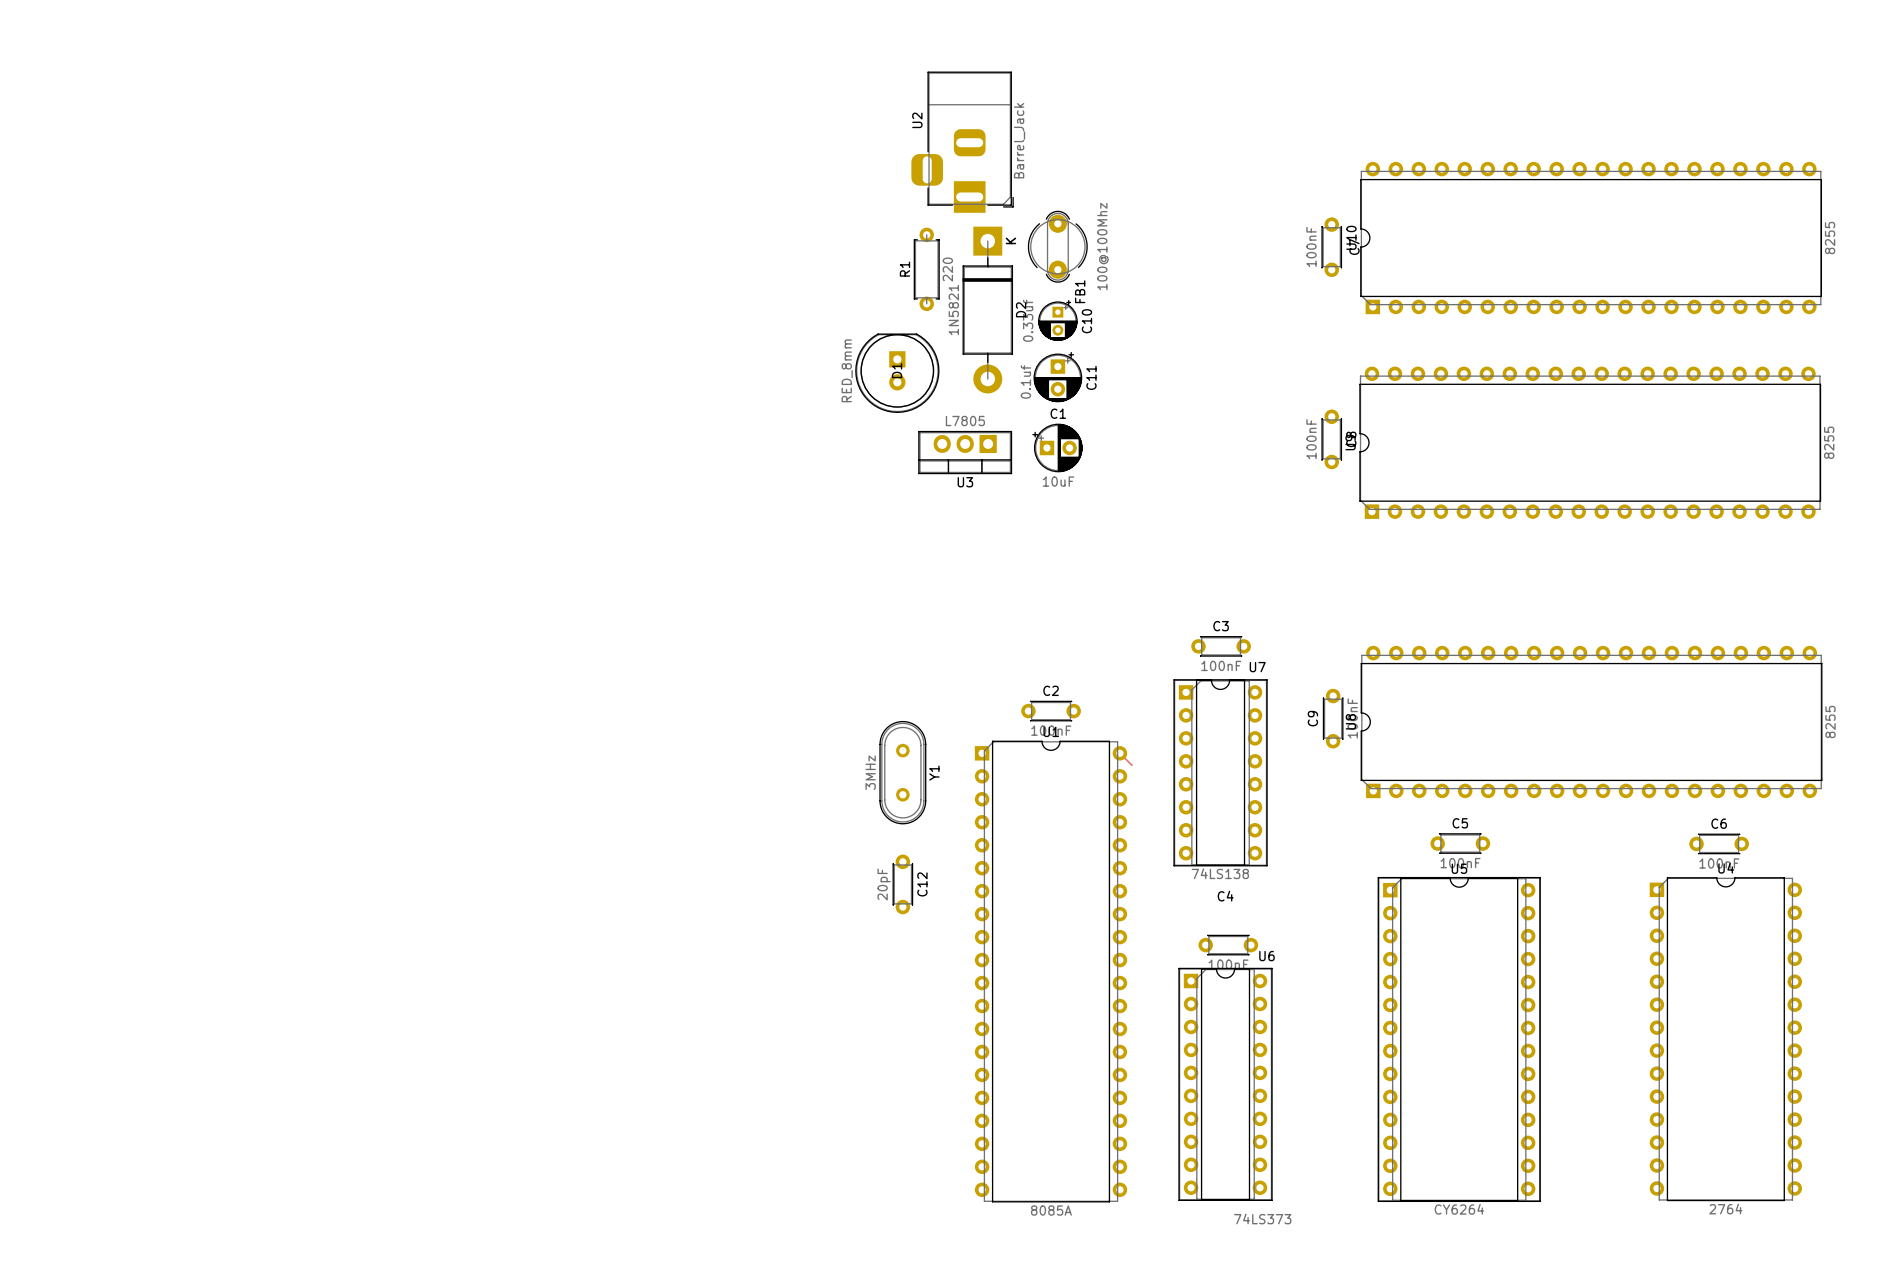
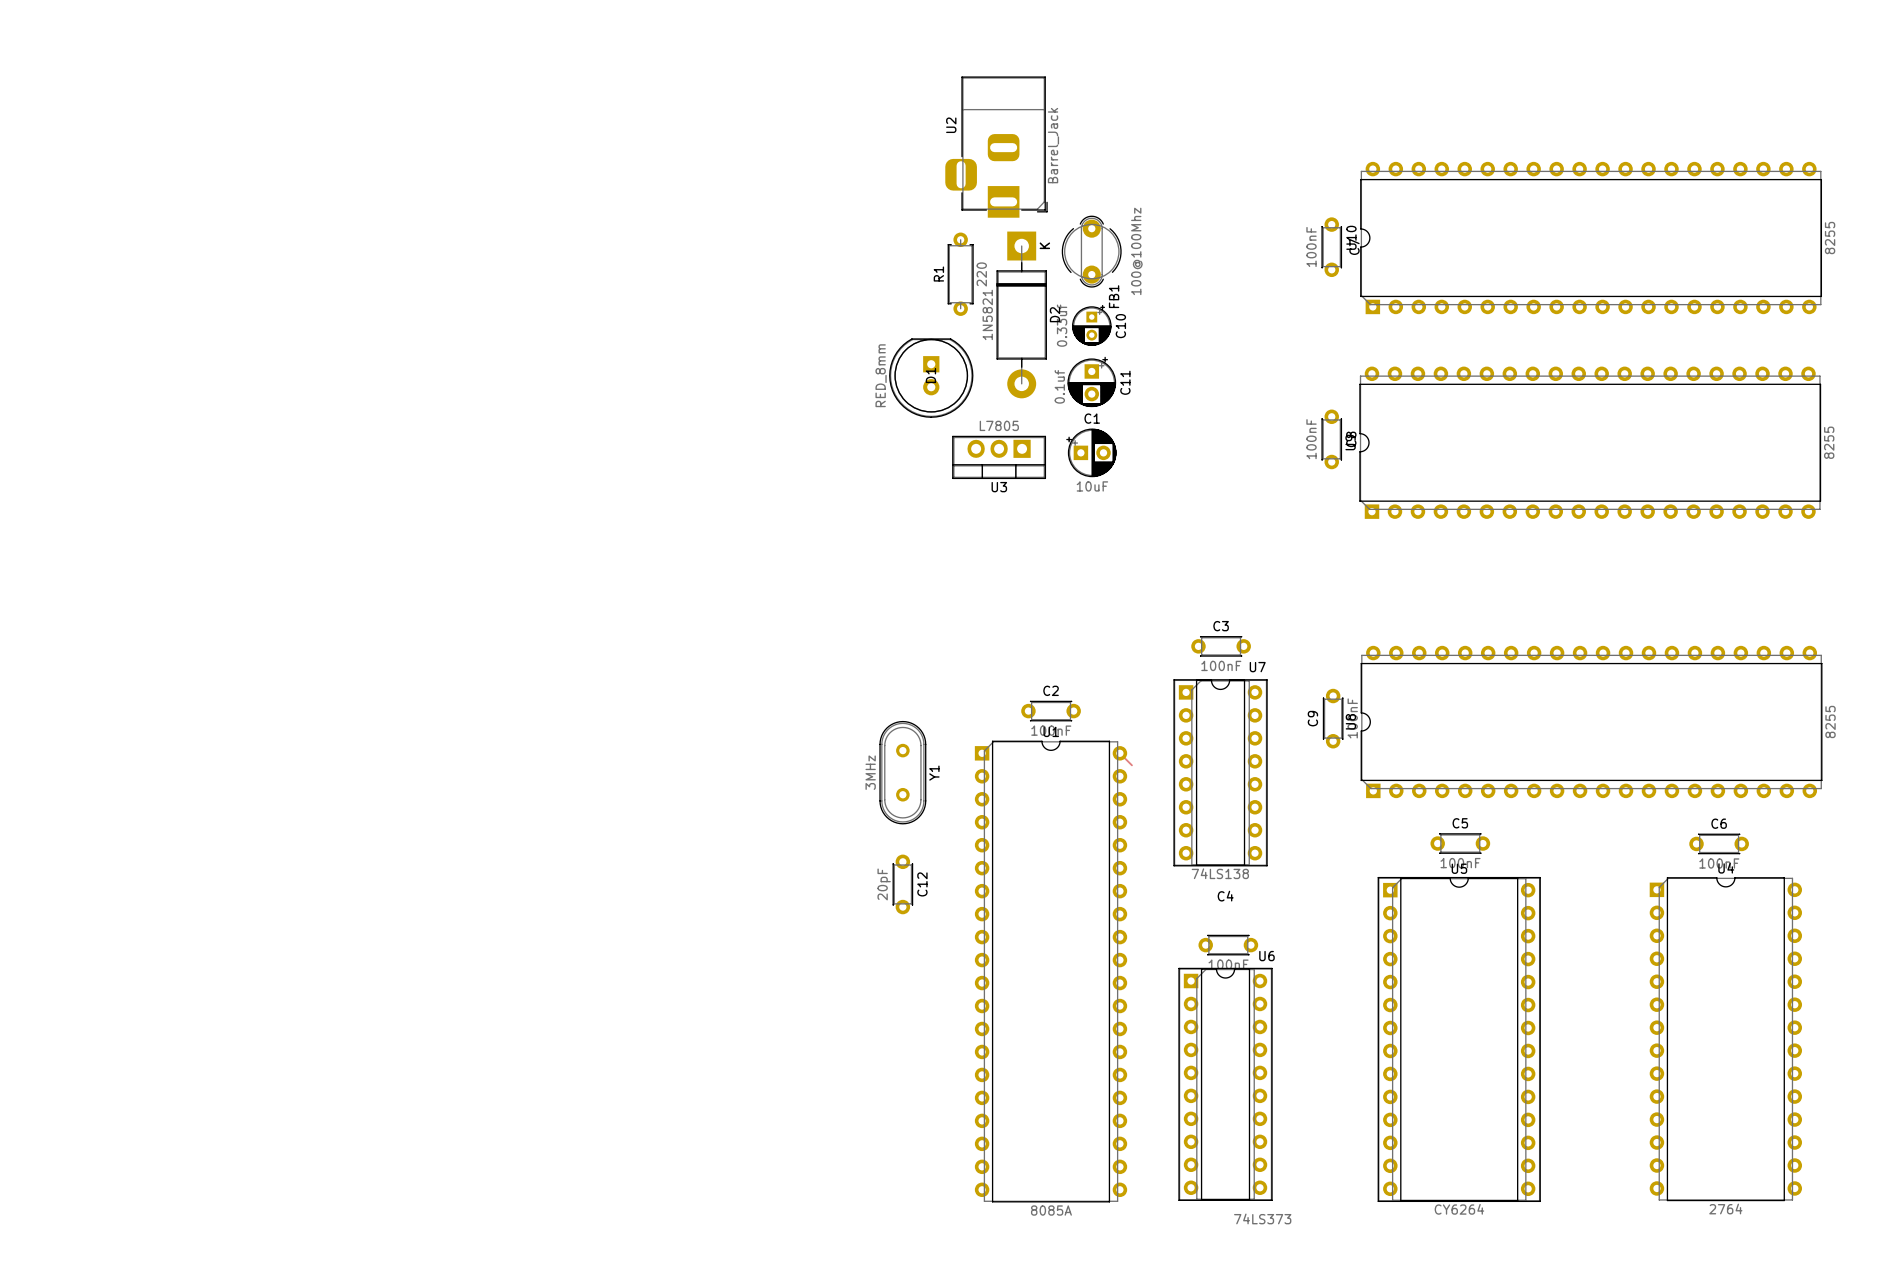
U2 position: (962, 142) -> (996, 147)
FB1 position: (1057, 246) -> (1091, 251)
R1 position: (926, 269) -> (960, 274)
D2 position: (987, 310) -> (1021, 314)
C10 position: (1057, 320) -> (1091, 325)
D1 position: (897, 373) -> (931, 378)
C11 position: (1057, 377) -> (1091, 381)
C1 position: (1057, 447) -> (1091, 452)
U3 position: (965, 452) -> (999, 457)

